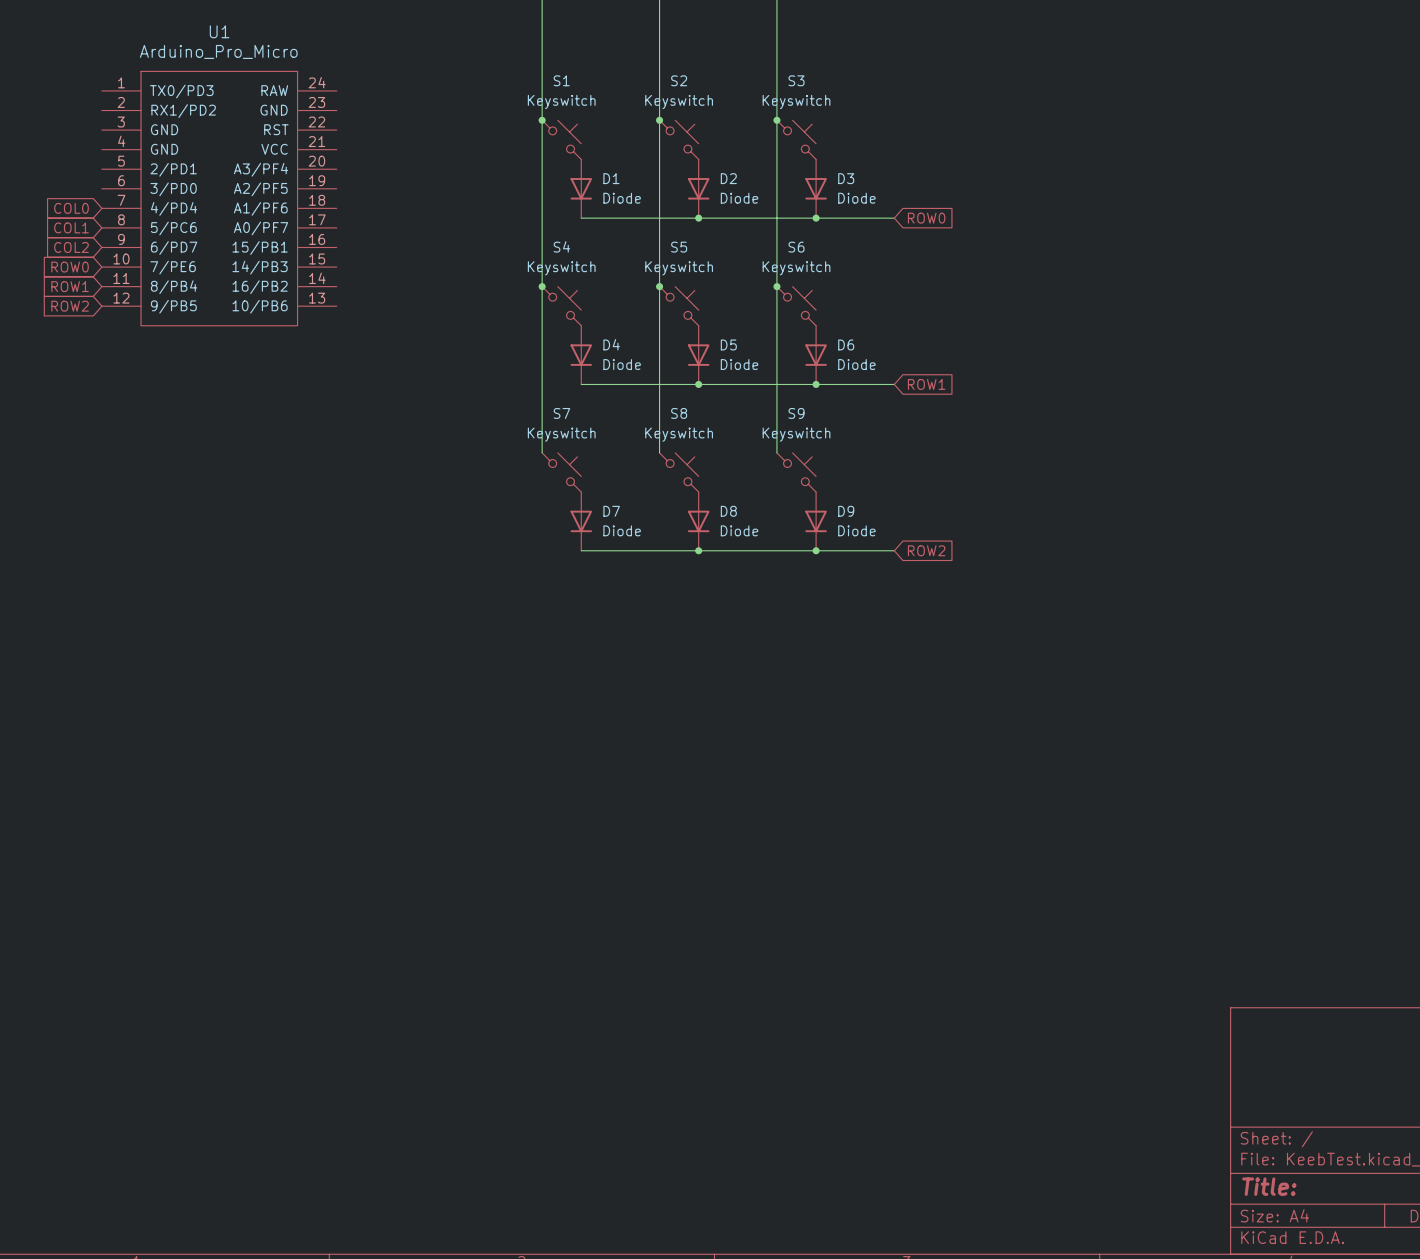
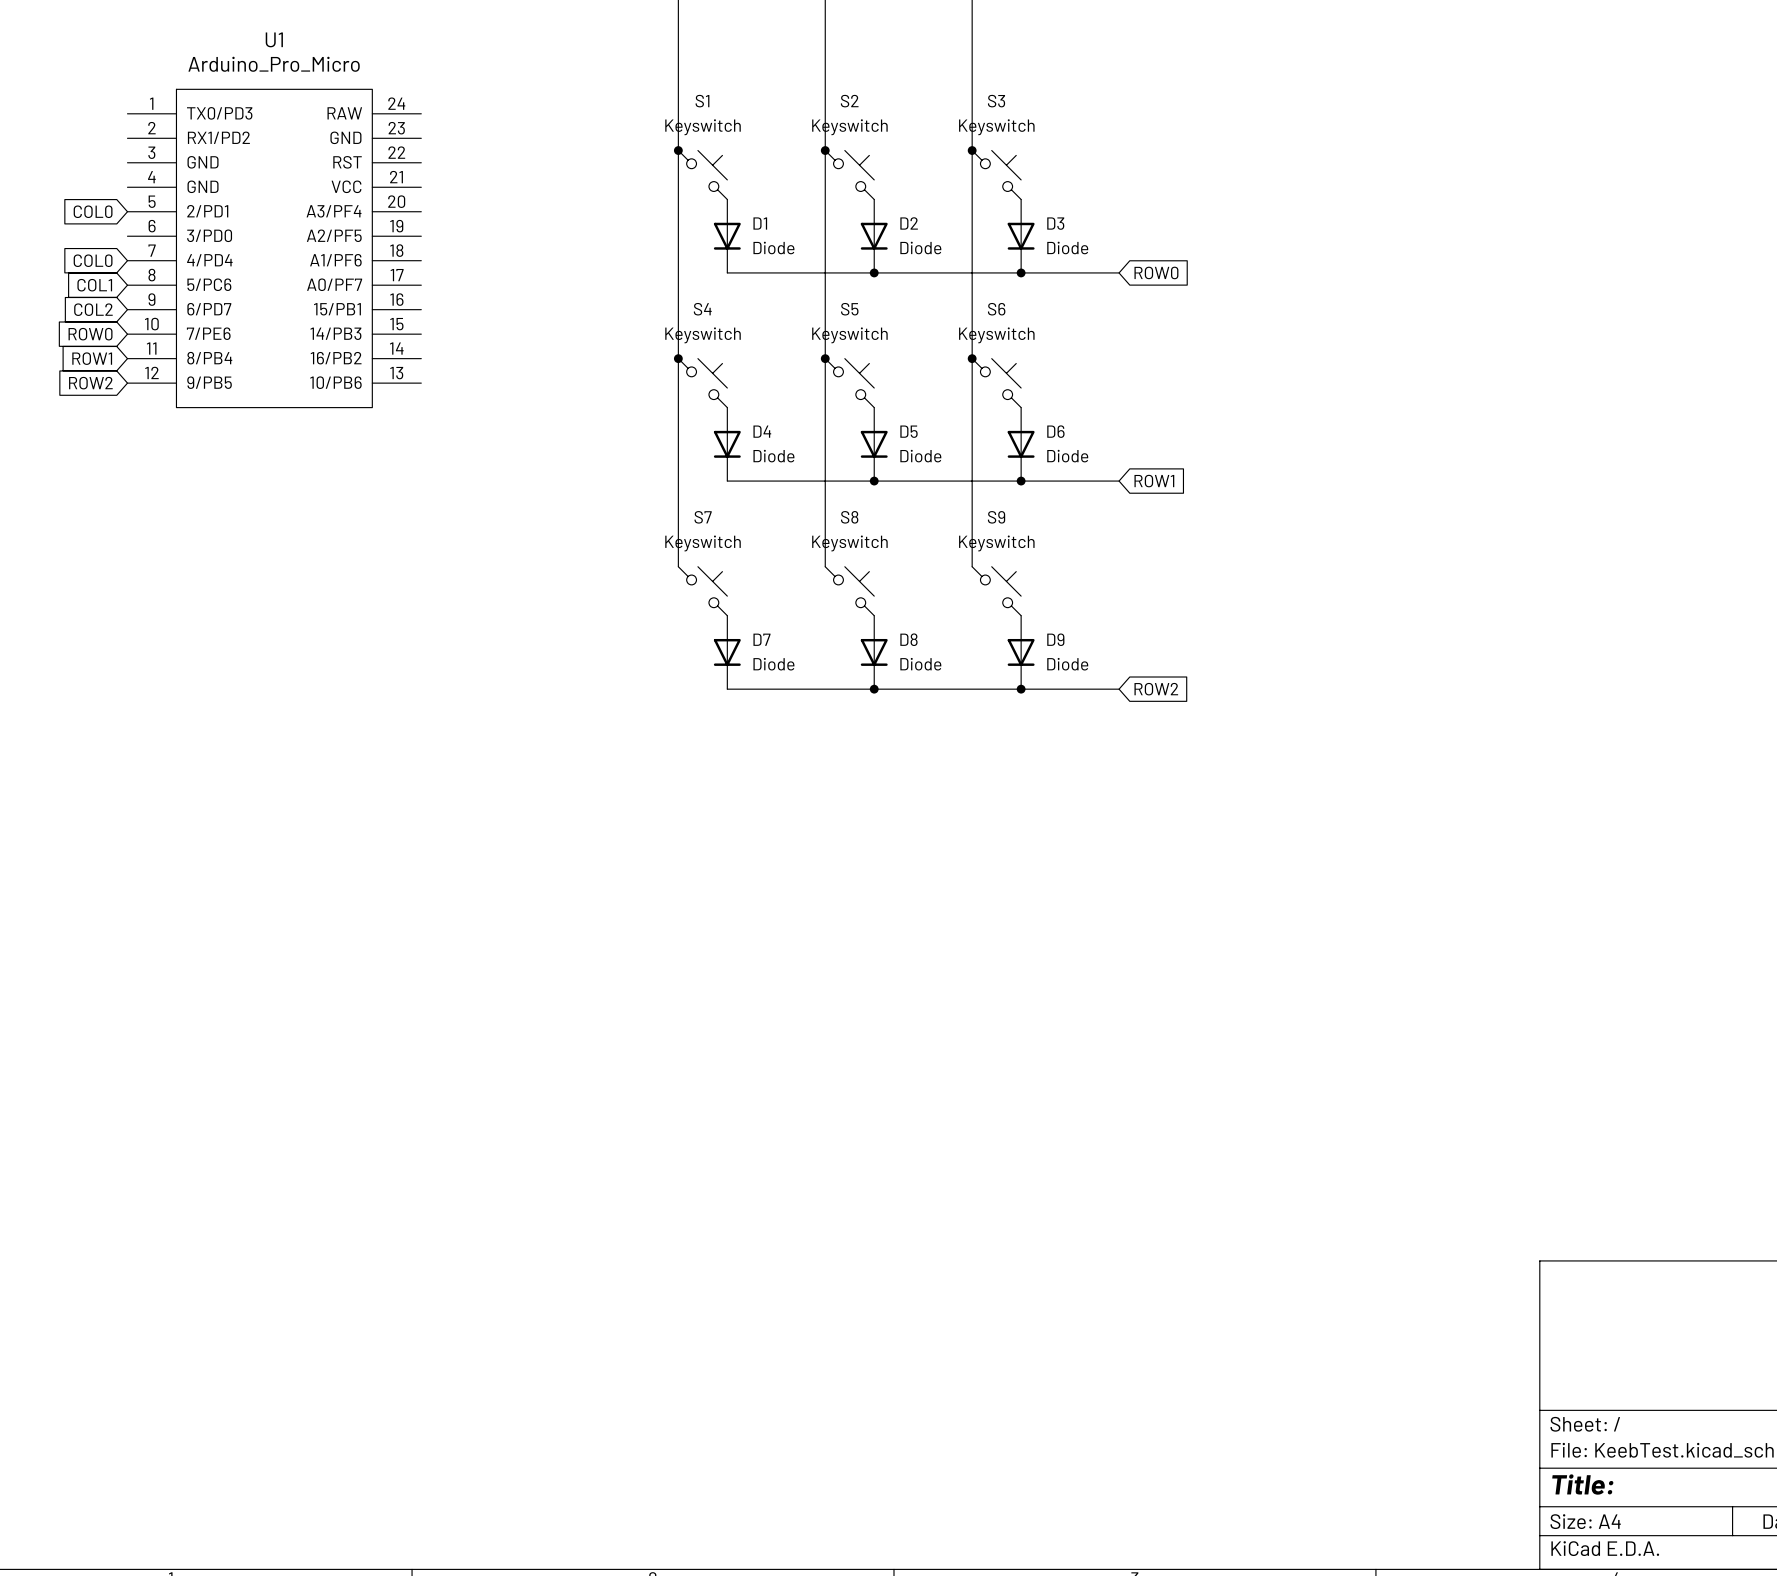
global label: none -> COL0 (93, 211)

